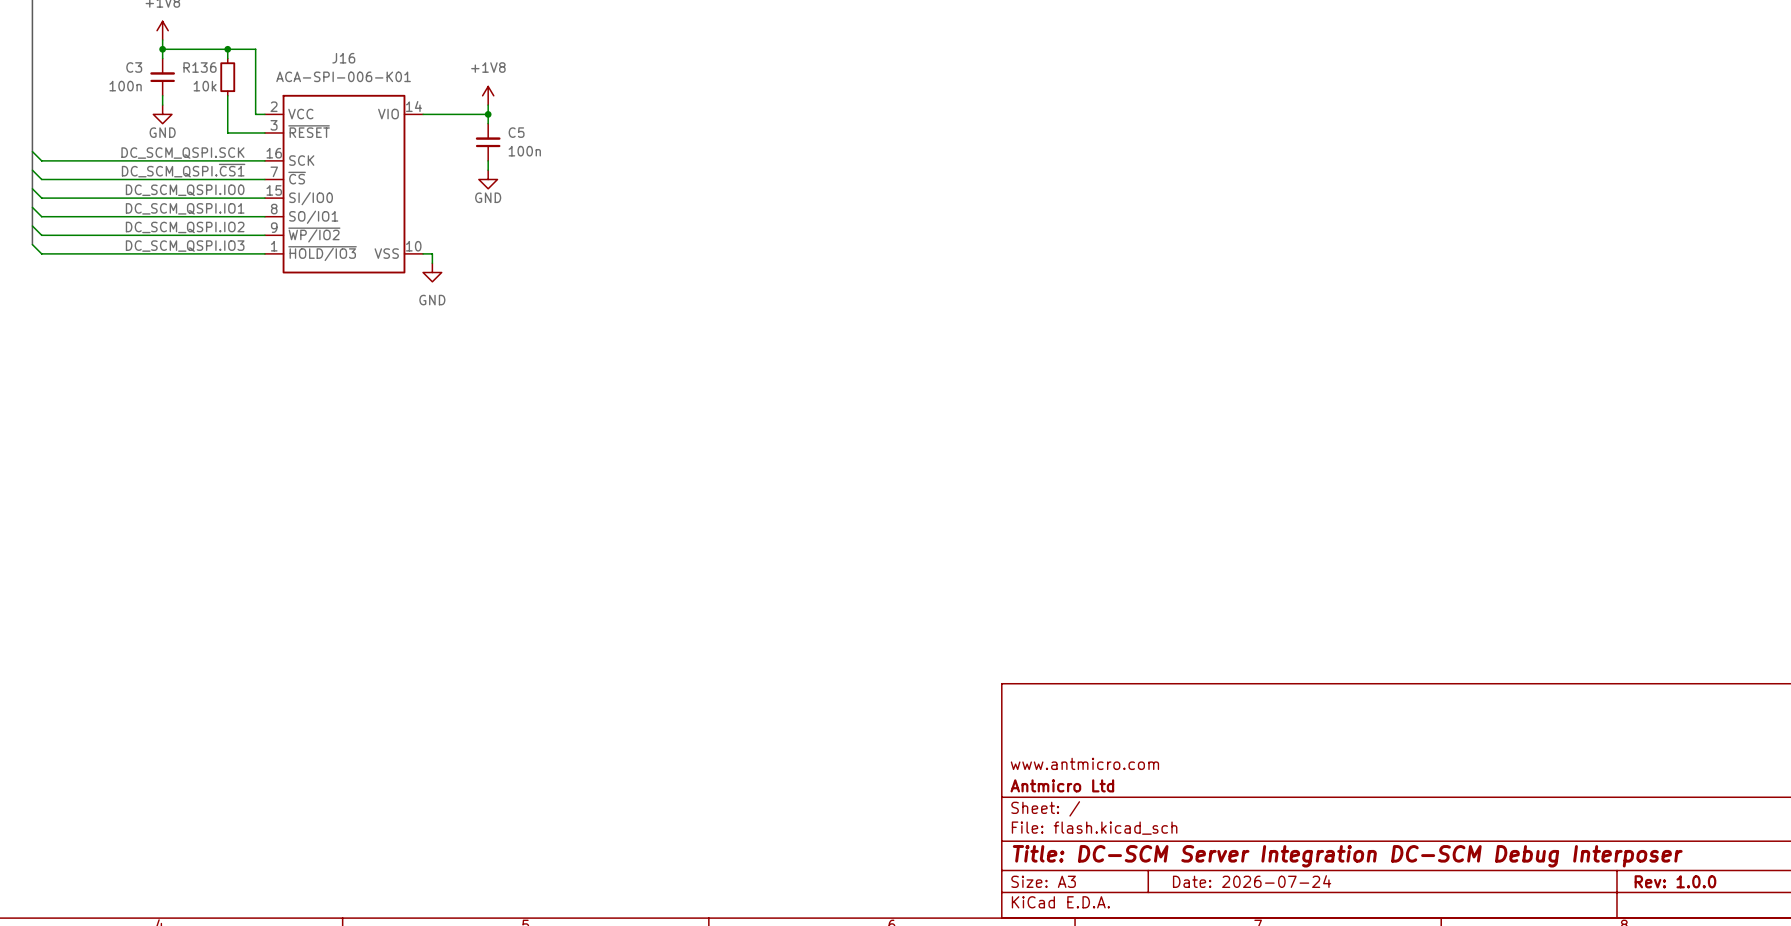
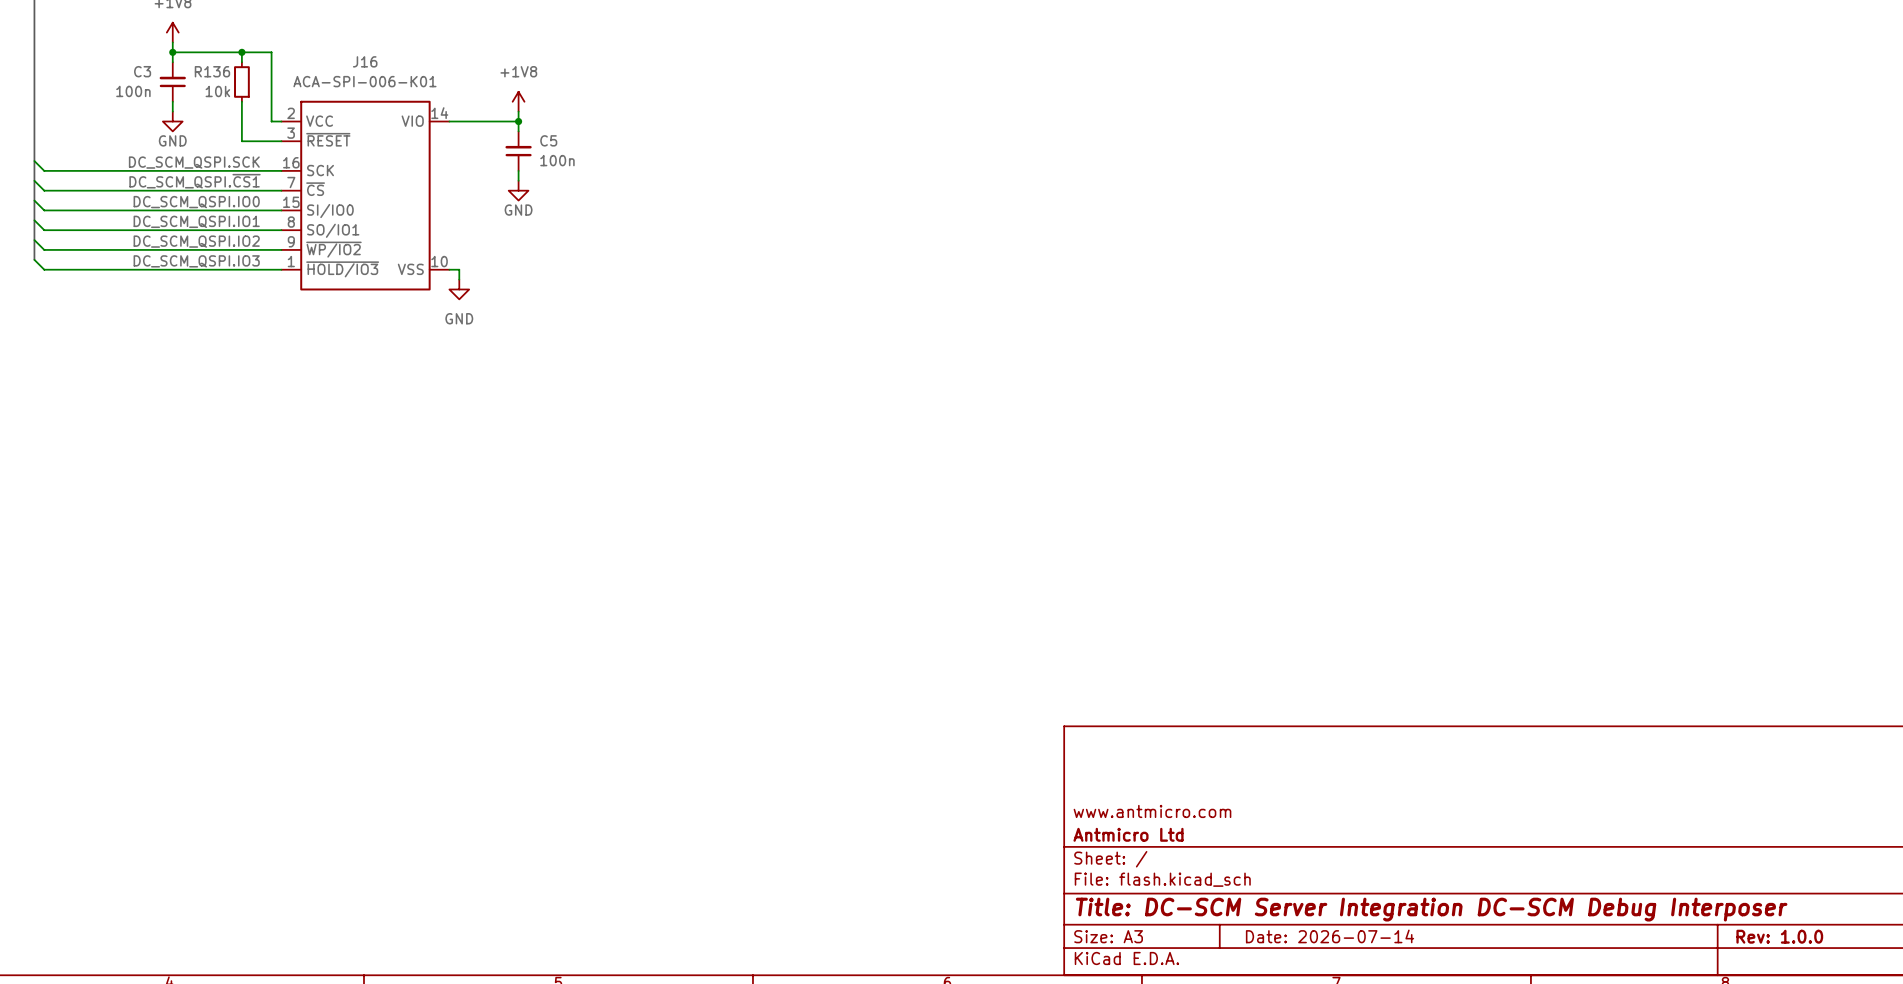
title block: Date: 2026-07-24 (1252, 881) -> Date: 2026-07-14 (1330, 936)

